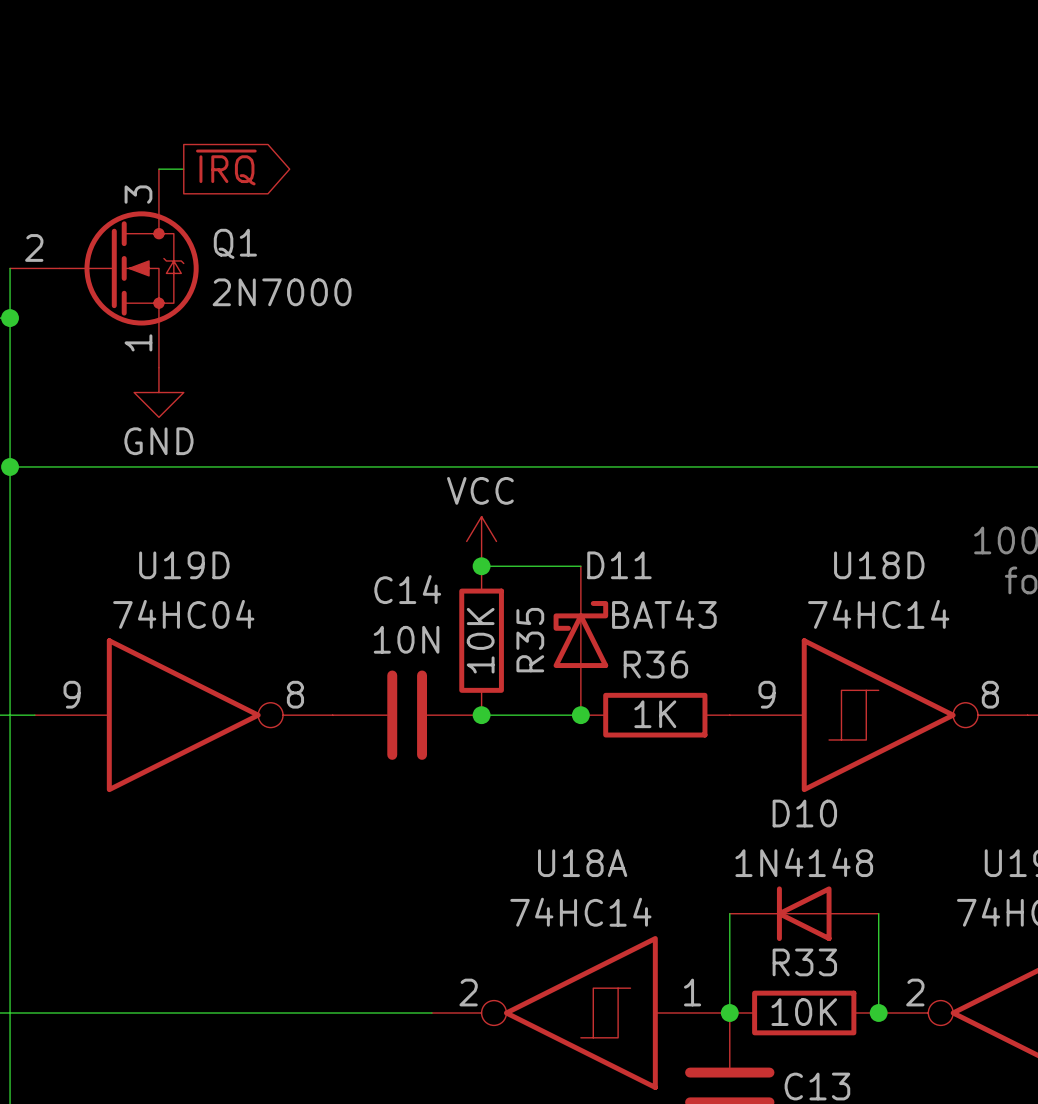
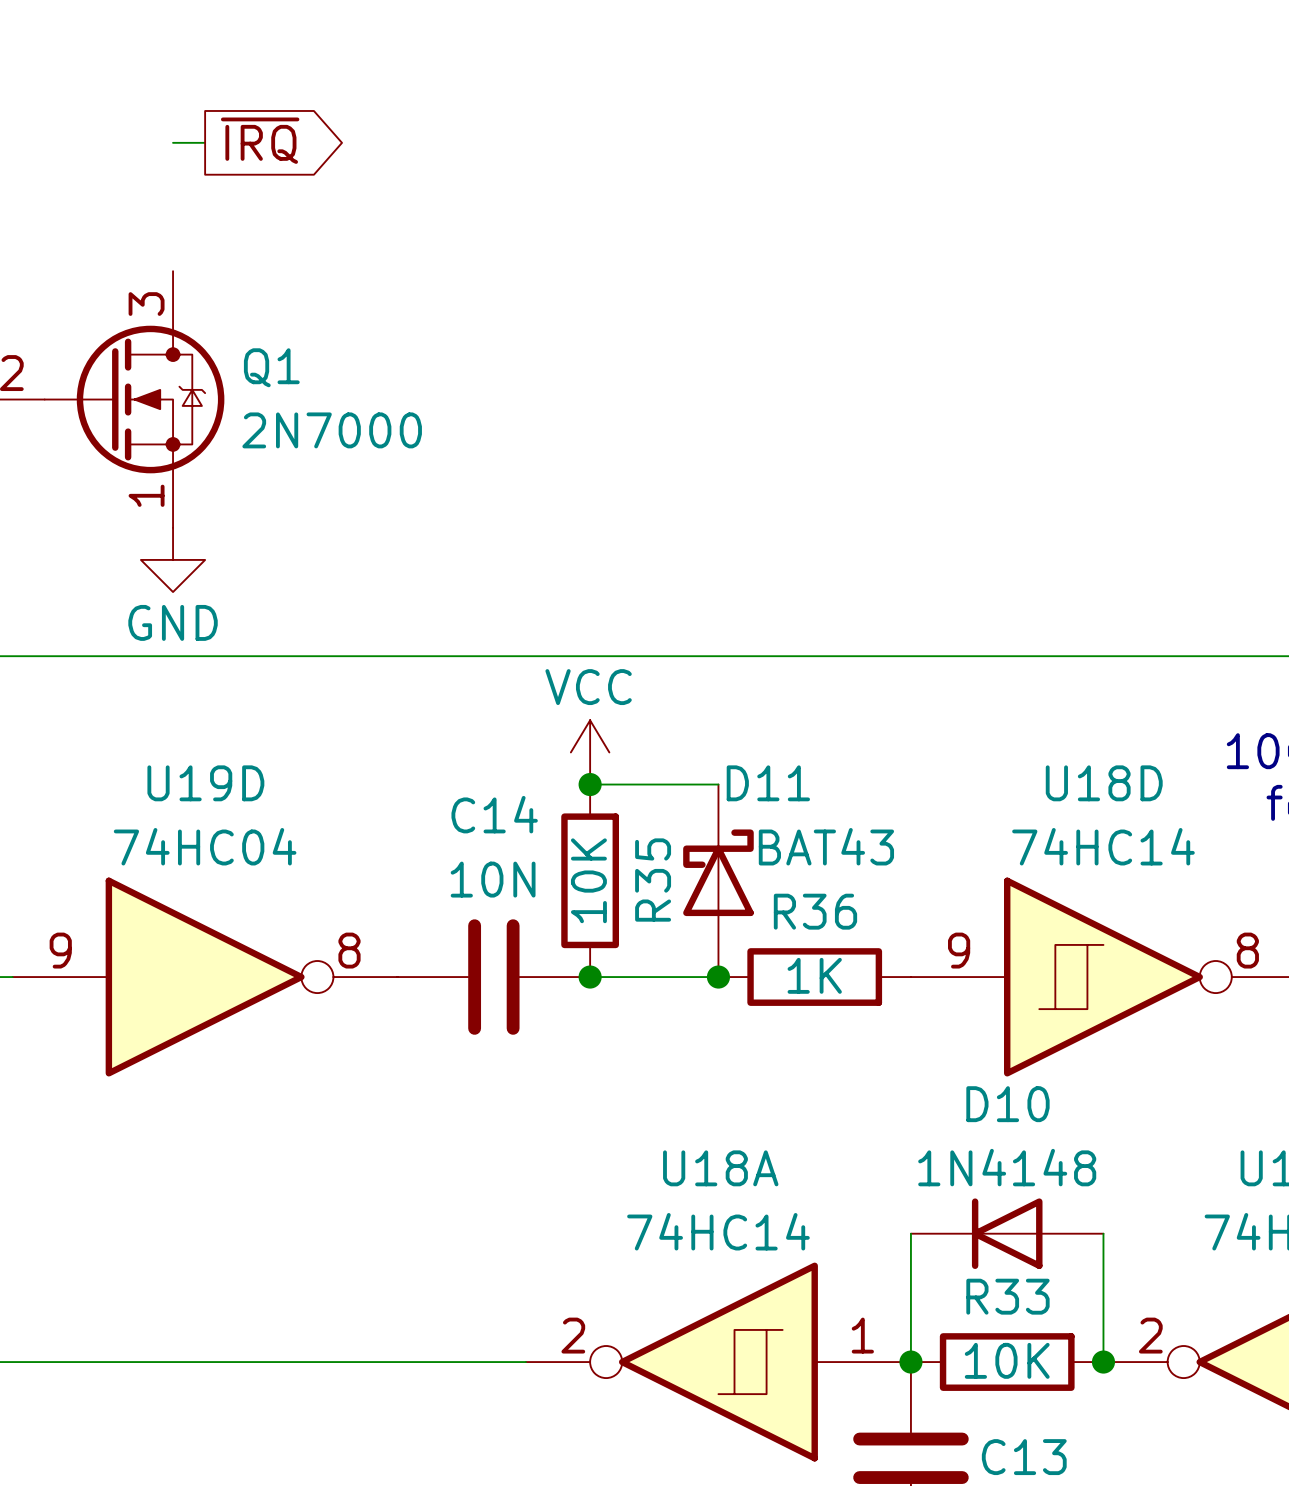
global label position: ~{IRQ} (226, 167) -> ~{IRQ} (260, 140)
wire: (158, 169) (183, 169) -> (173, 142) (205, 142)

